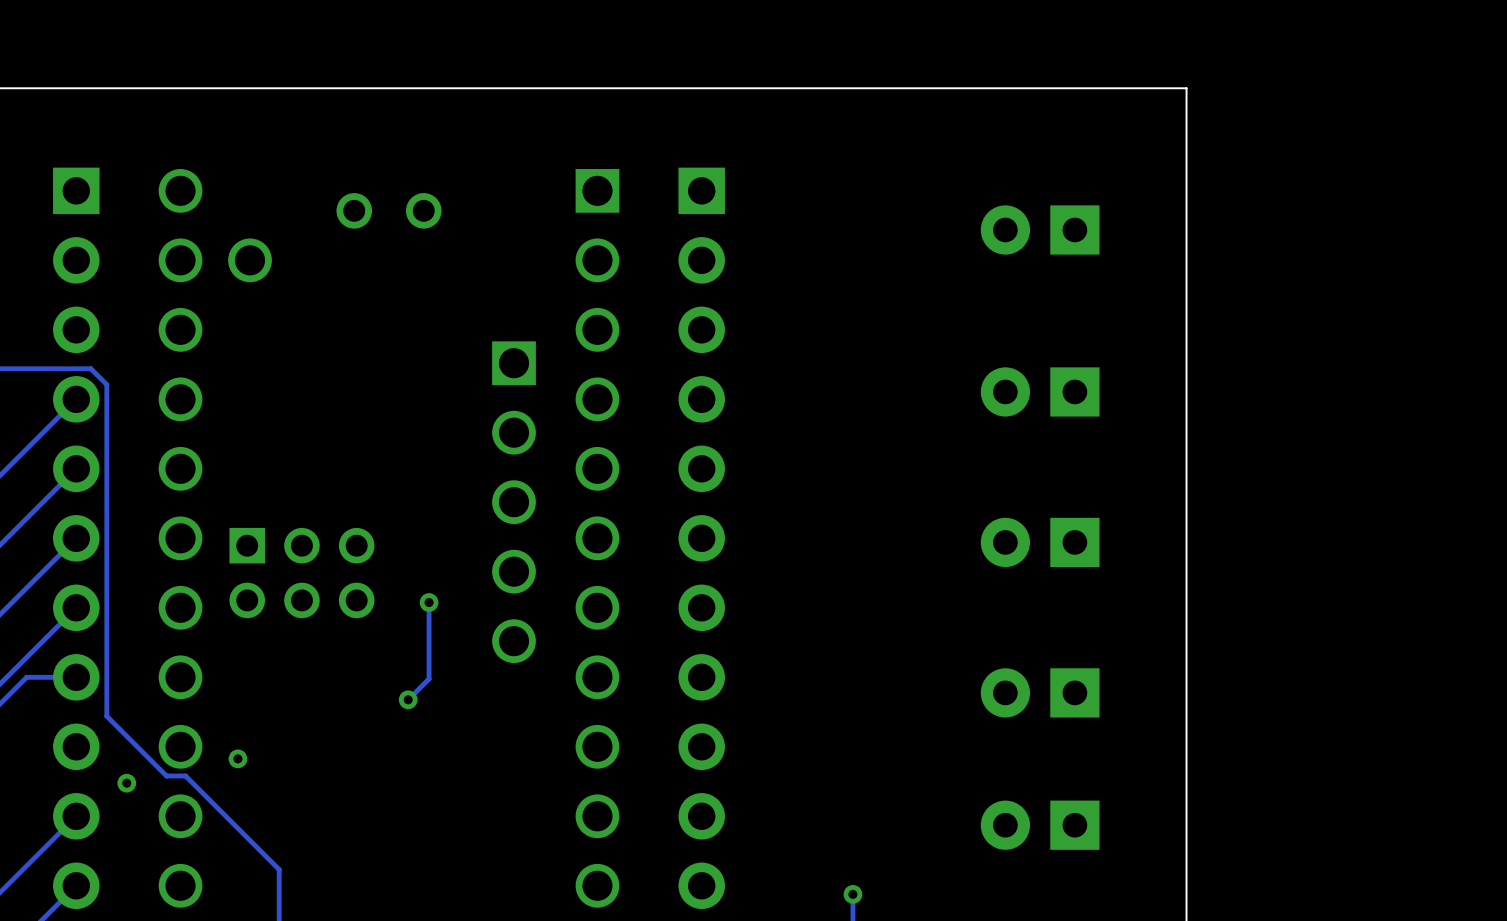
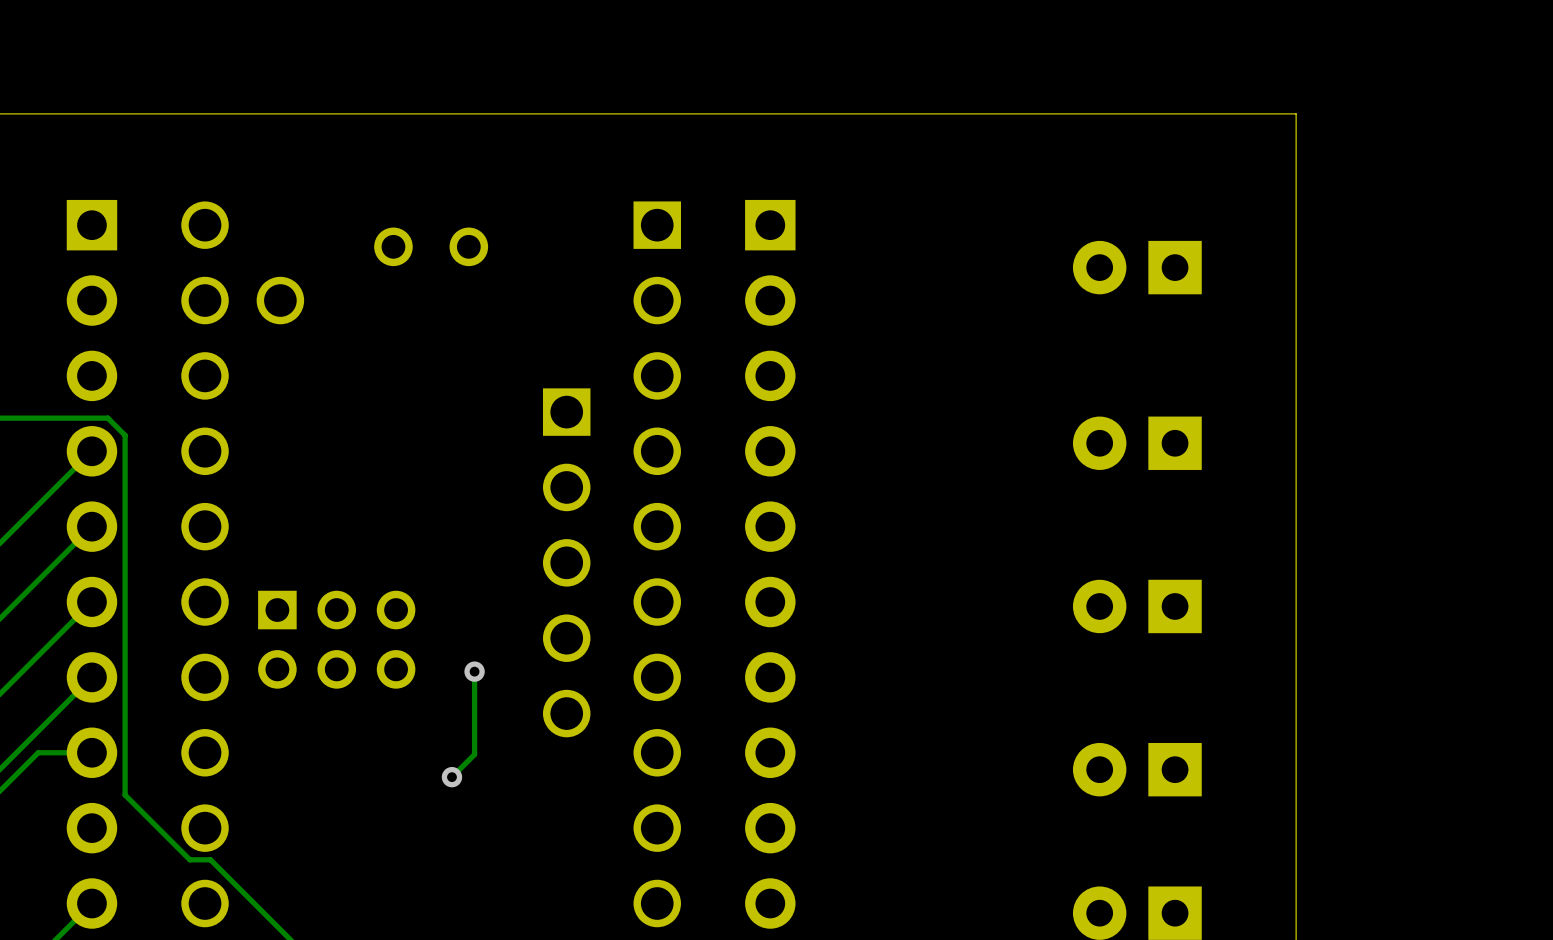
via: (237, 758) -> none
via: (126, 783) -> none

